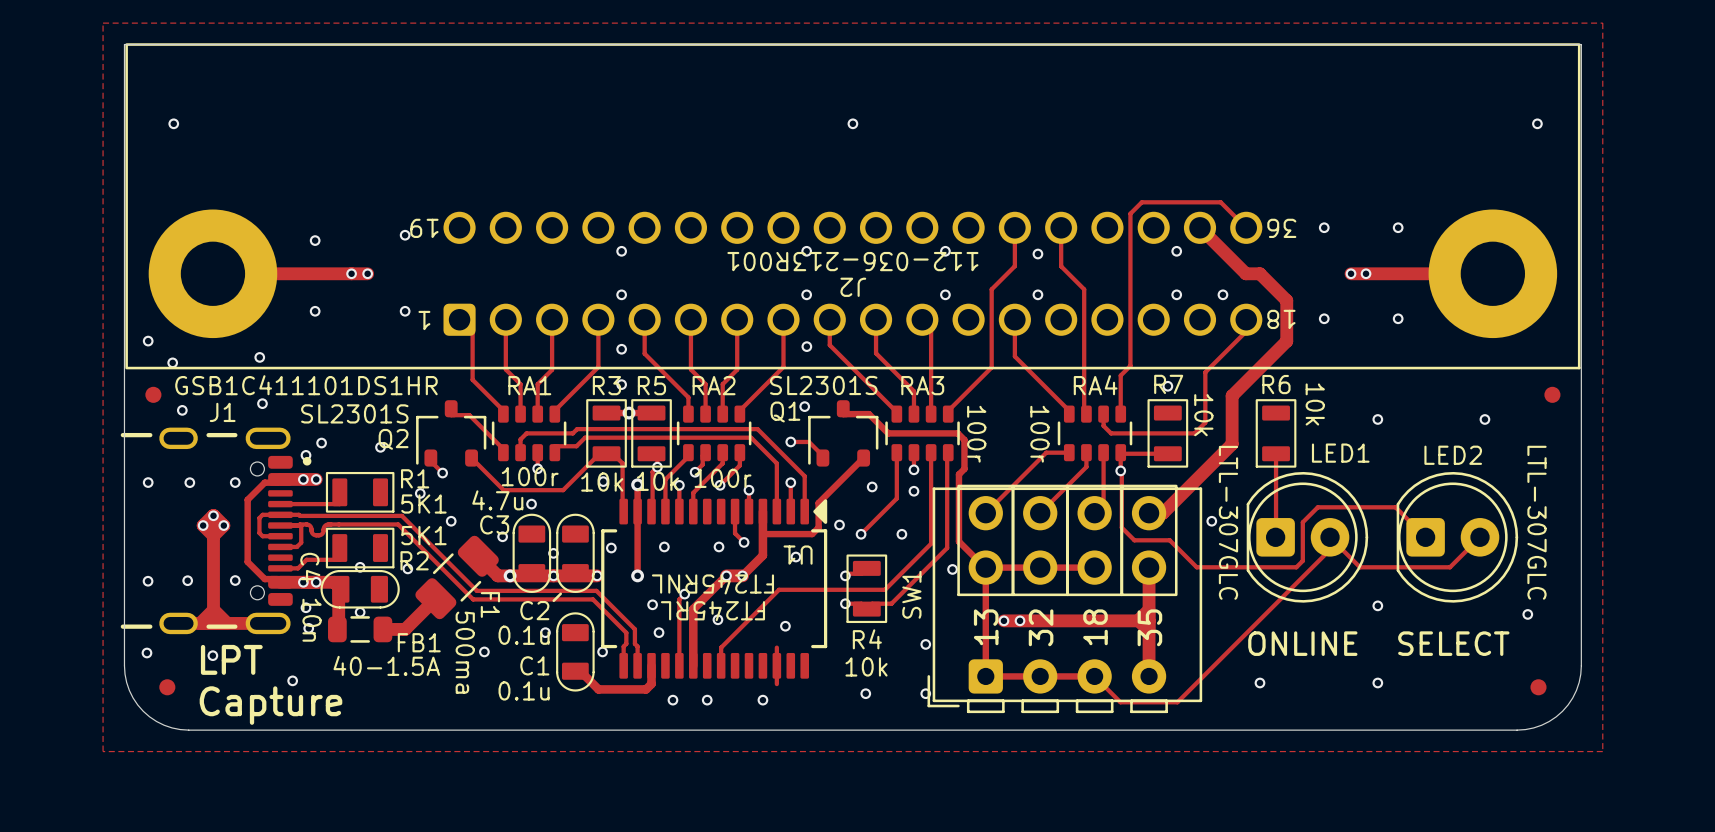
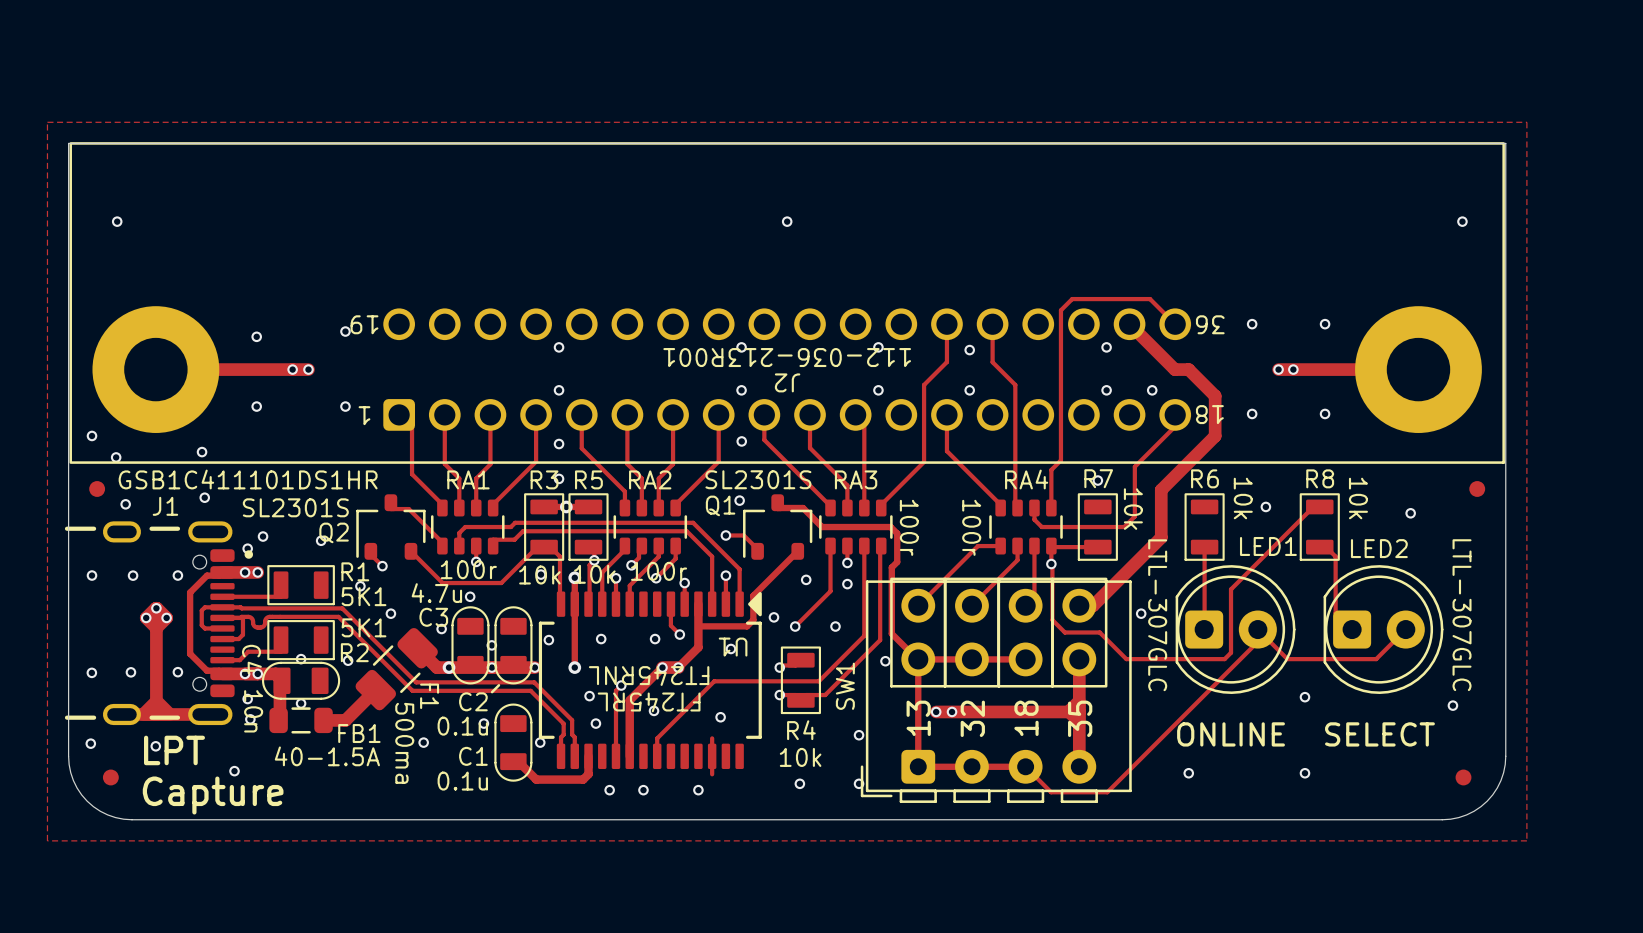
via position: (1377, 419) -> (1265, 506)
R8: none -> 10k (1319, 527)
track: none -> (1319, 547) (1326, 547) (1335, 556) (1335, 613)
track: (1408, 520) (1395, 507) (1317, 507) (1302, 522) -> (1319, 506) (1313, 506) (1231, 589) (1231, 614)

